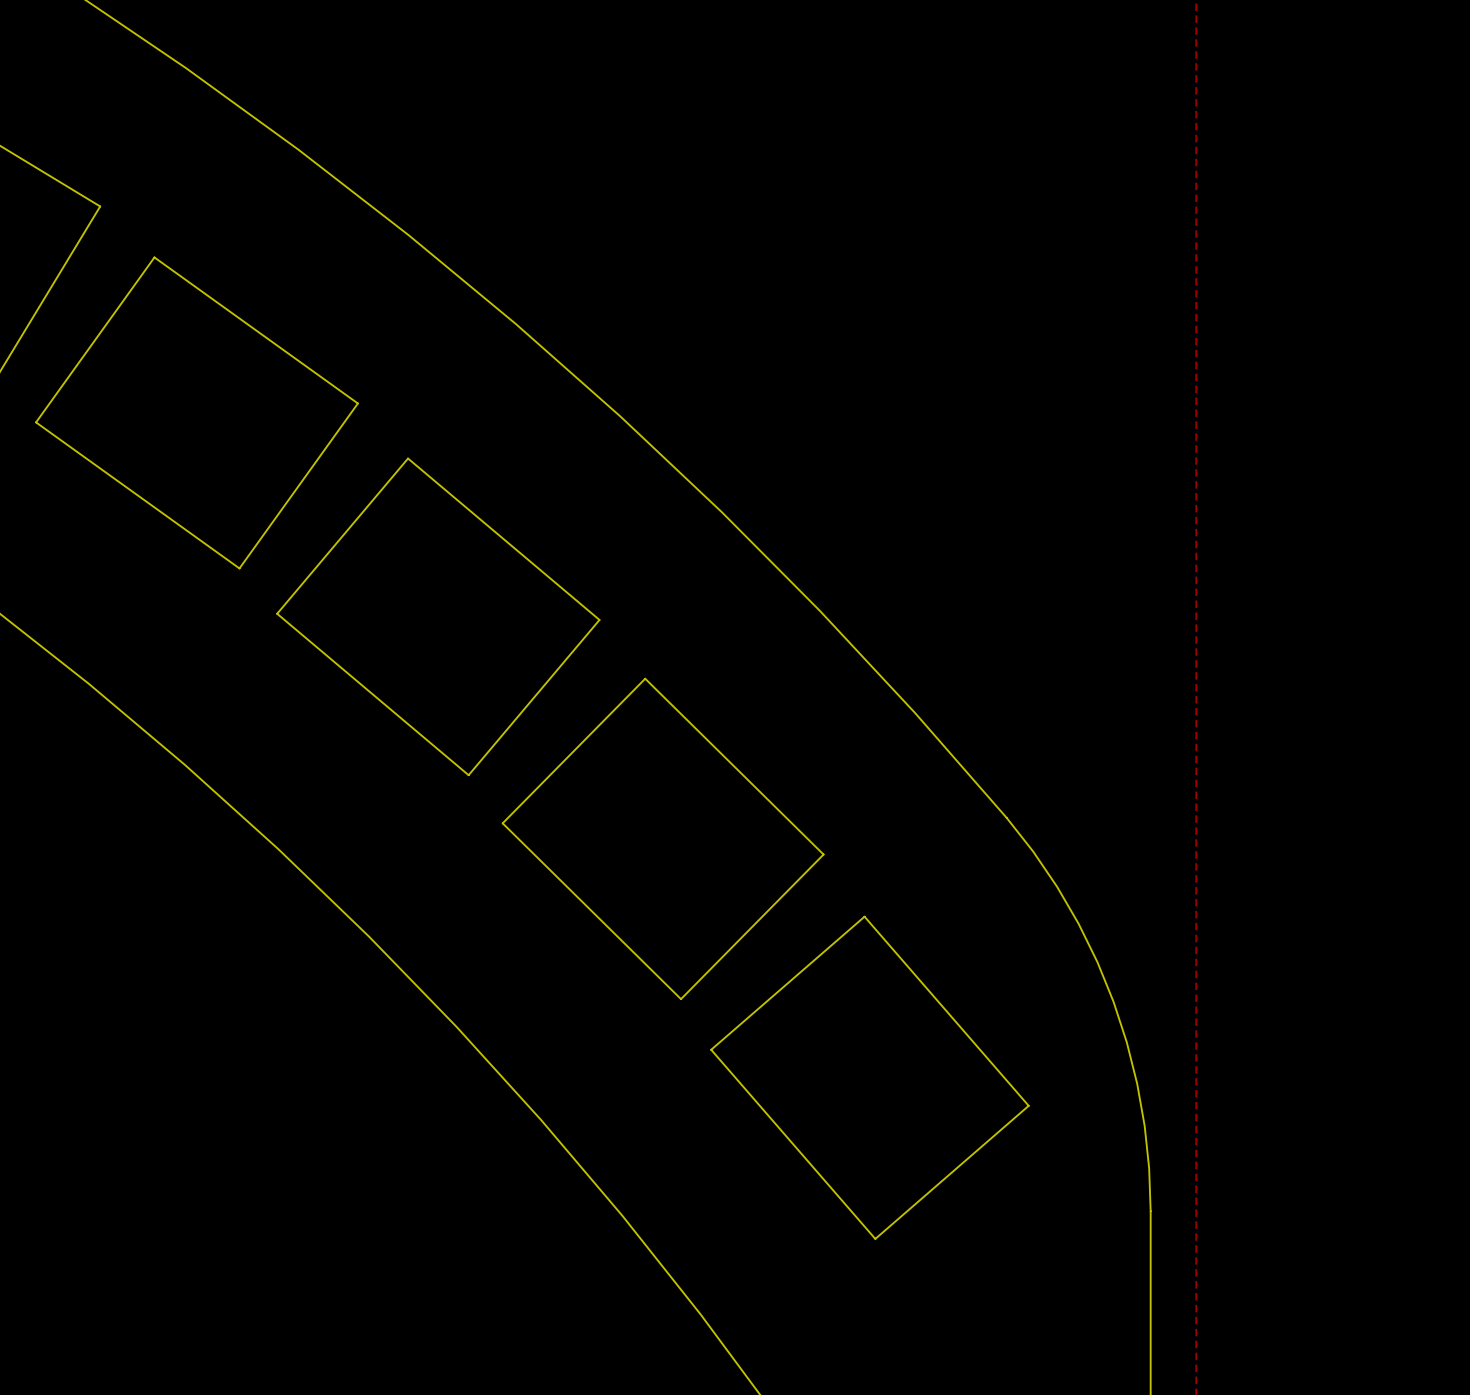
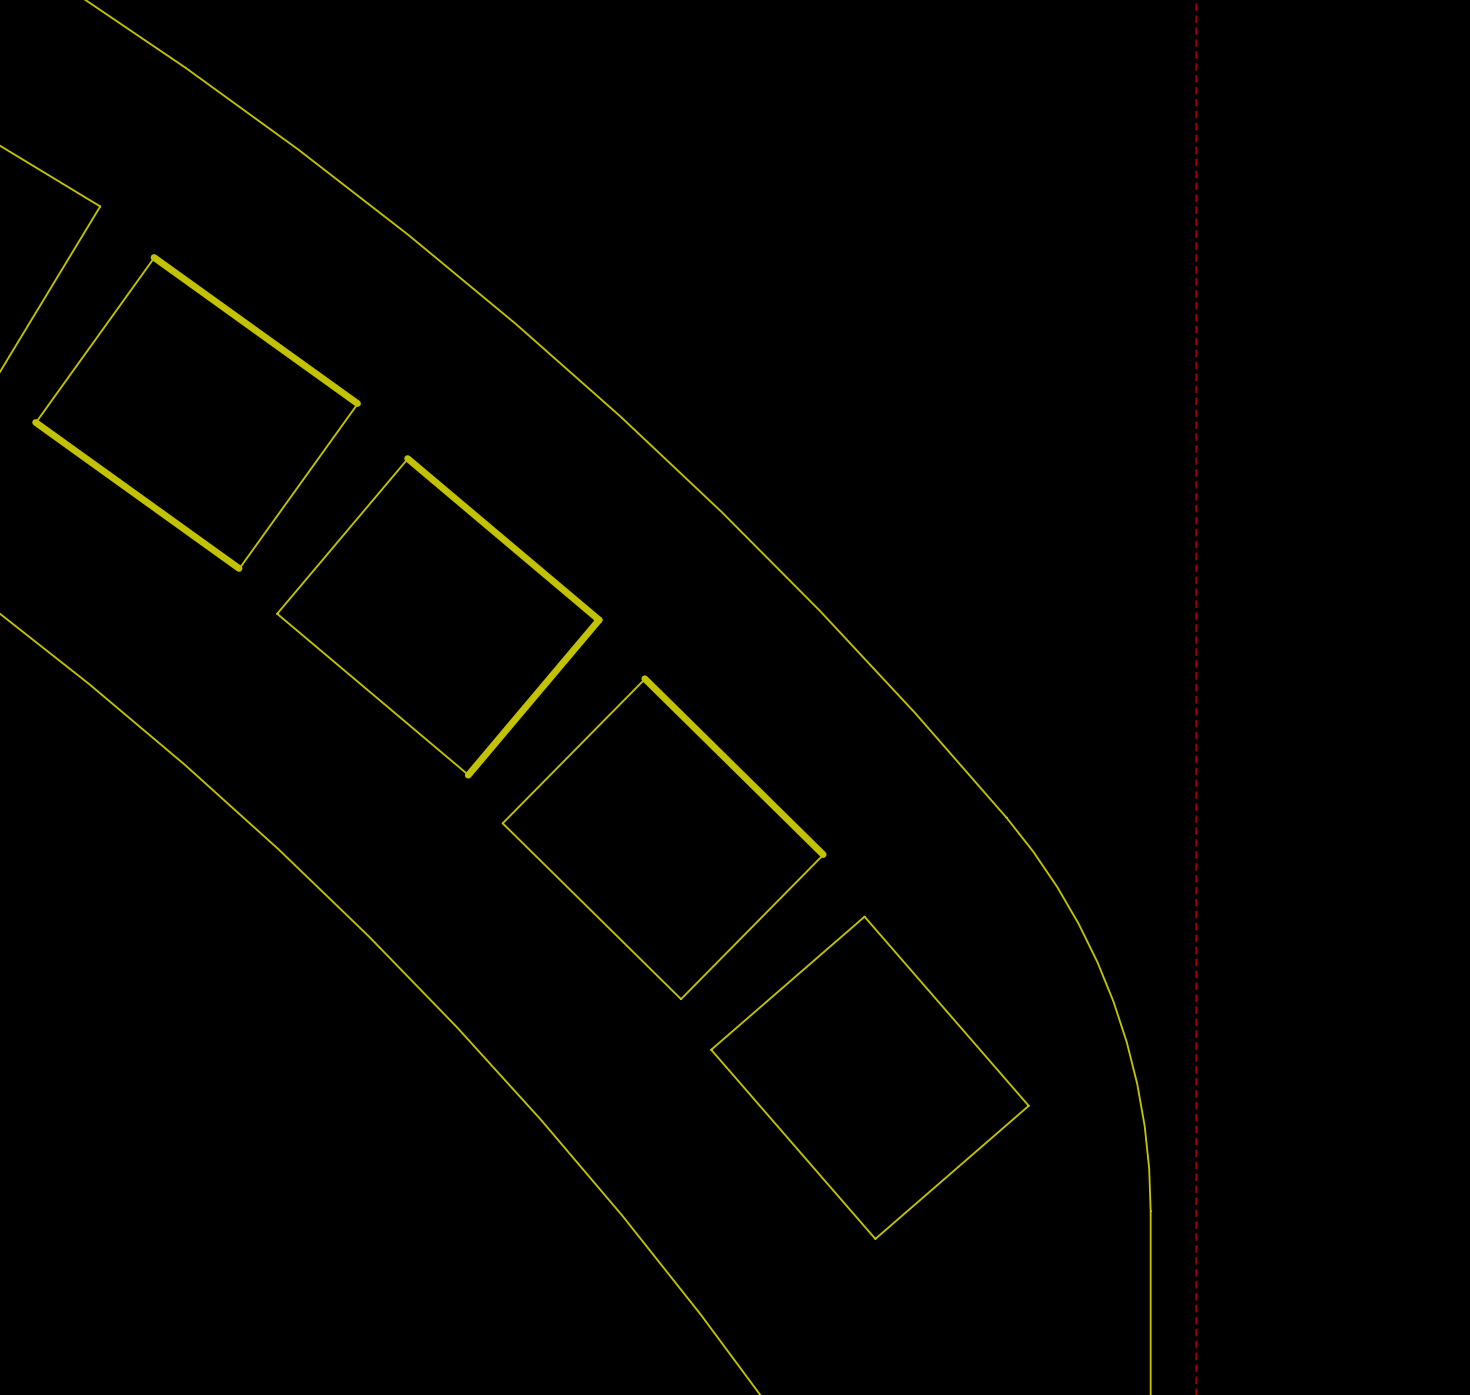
board edge width: thin (154, 257) (357, 403) -> thick (154, 257) (357, 403)
board edge width: thin (36, 422) (239, 568) -> thick (36, 422) (239, 568)
board edge width: thin (408, 458) (599, 619) (468, 775) -> thick (408, 458) (599, 619) (468, 775)
board edge width: thin (645, 678) (823, 854) -> thick (645, 678) (823, 854)

